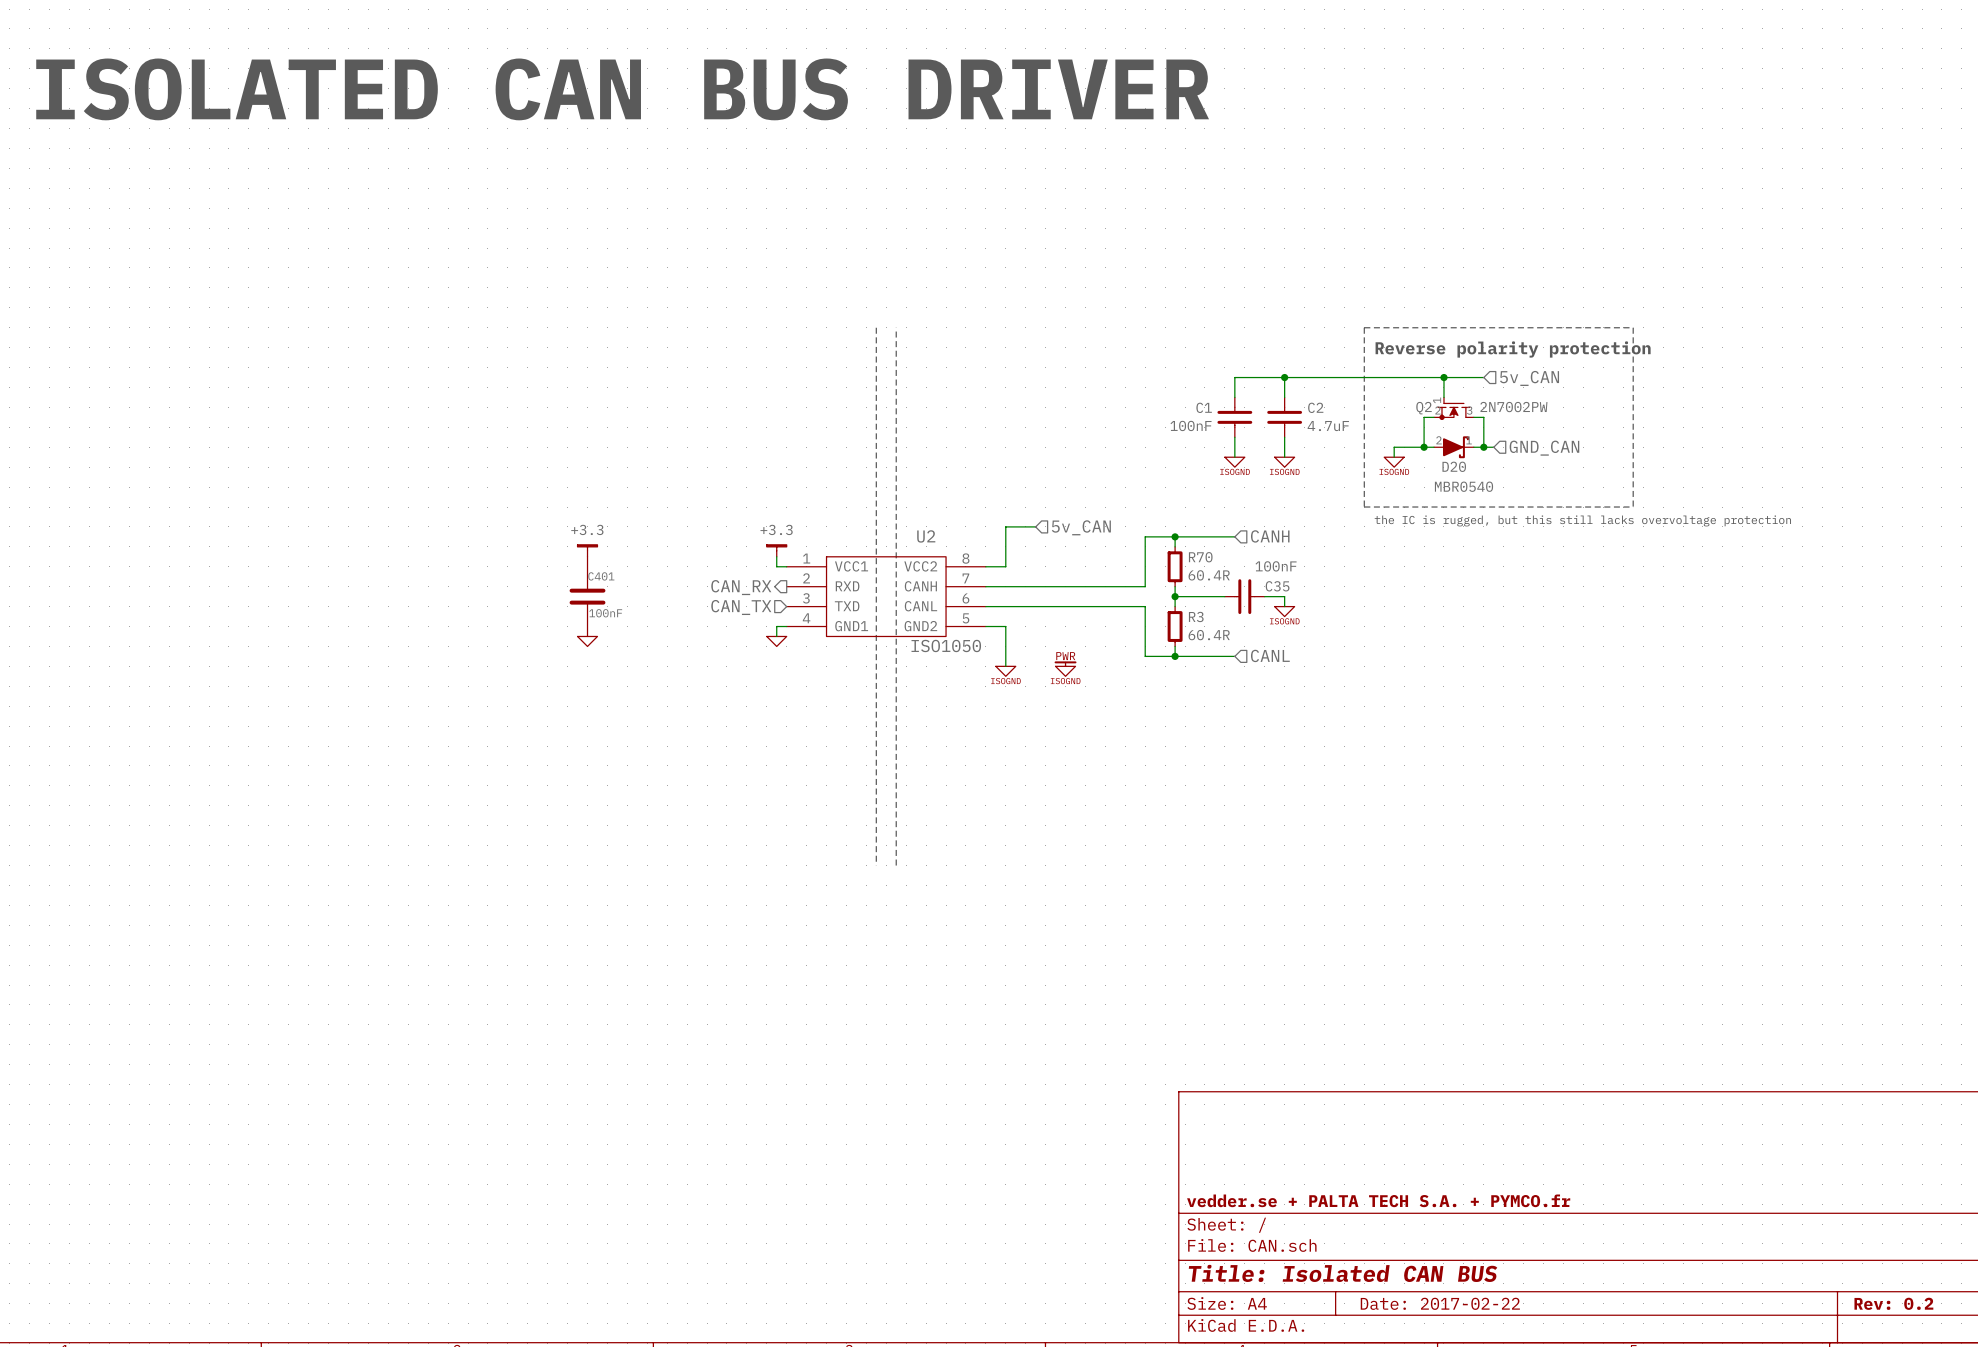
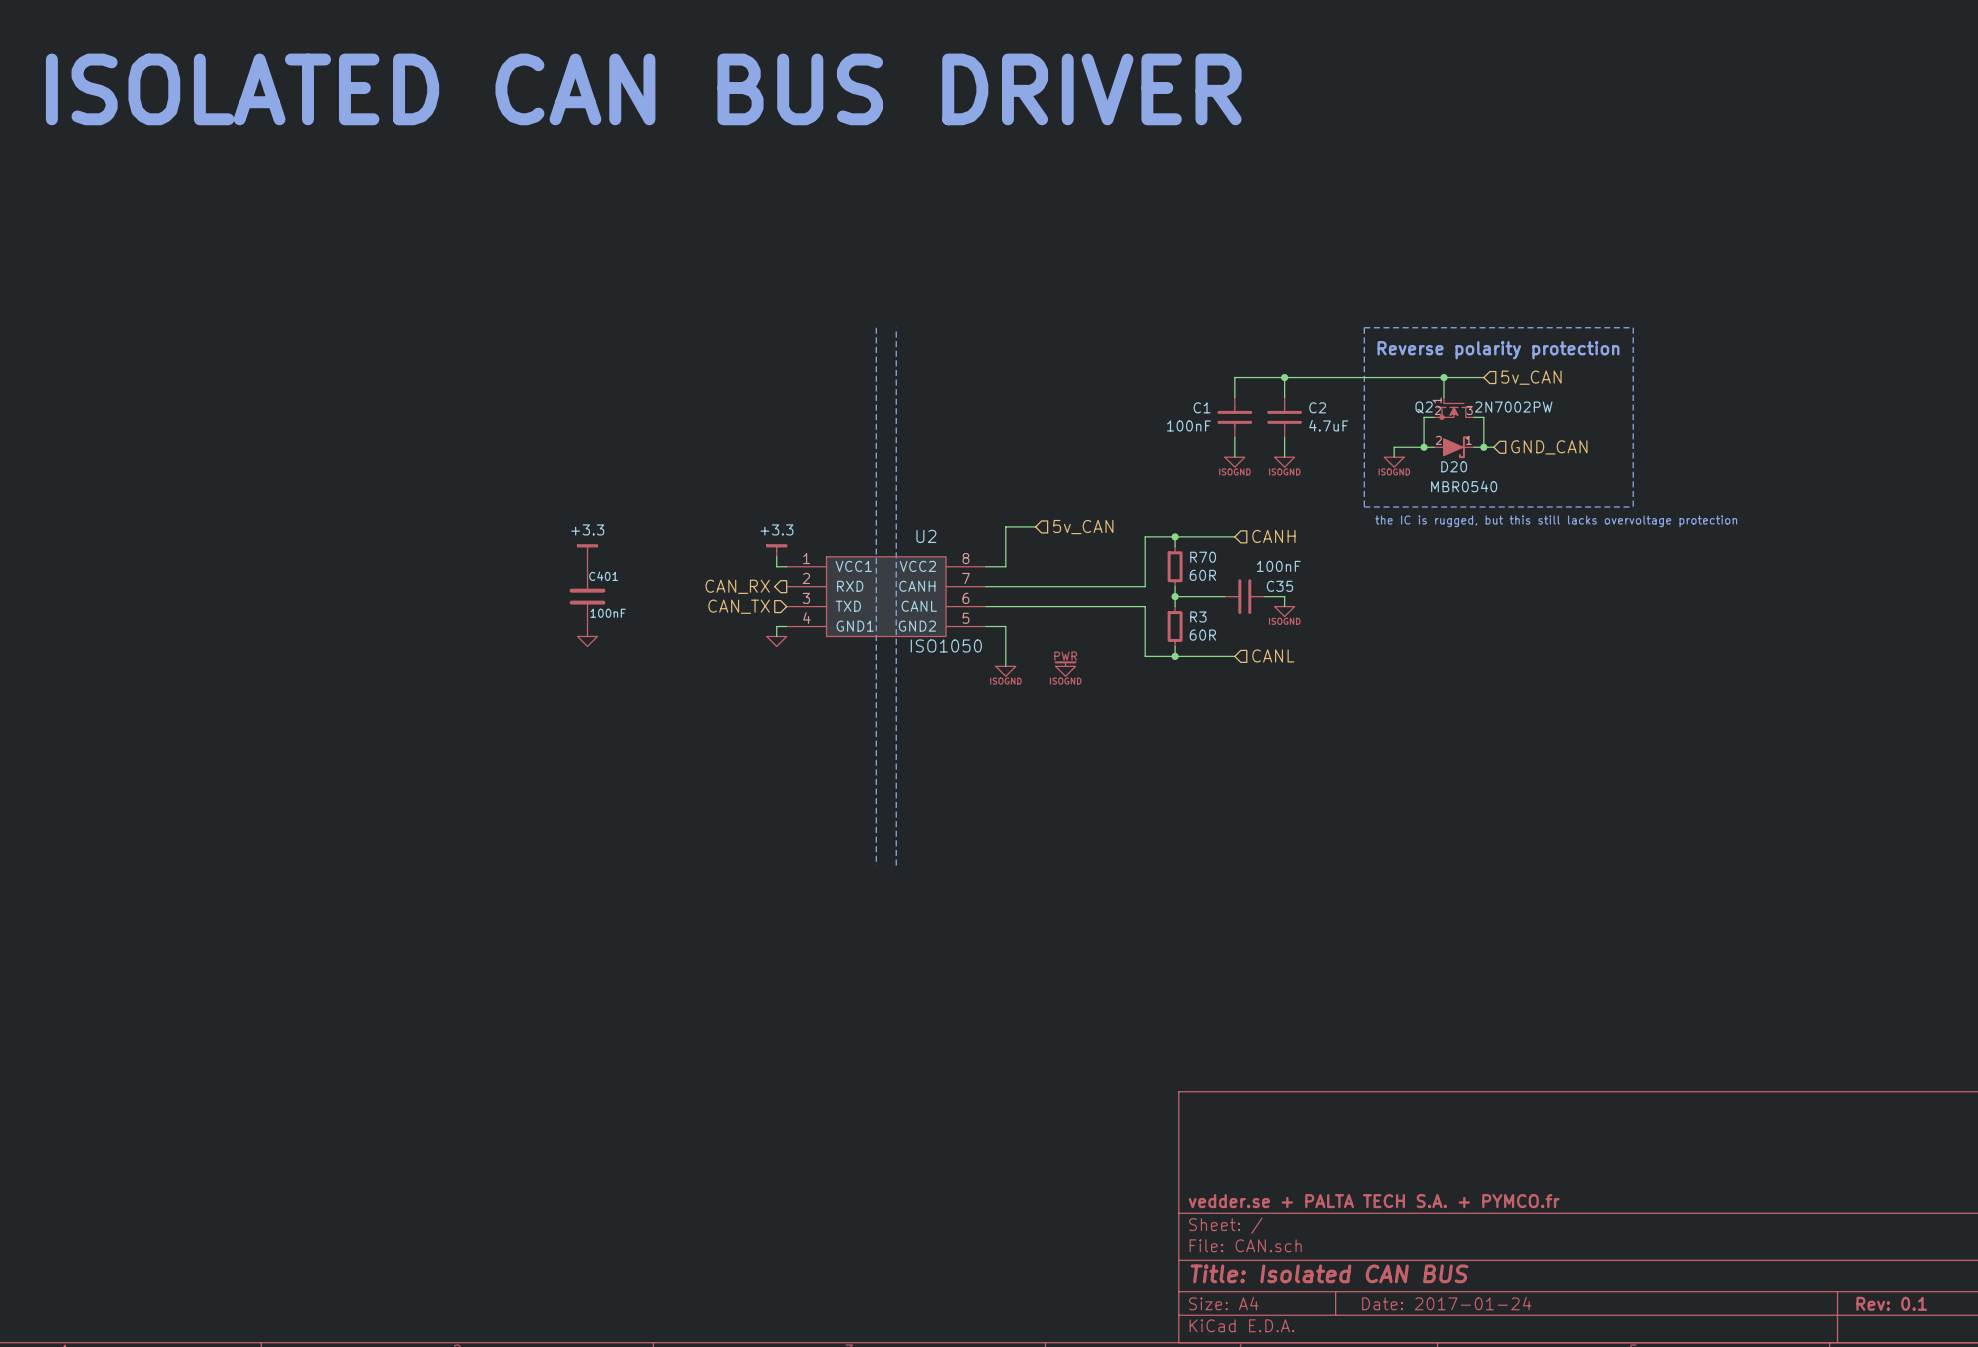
R70 value: 60.4R (1209, 575) -> 60R (1202, 575)
R3 value: 60.4R (1209, 635) -> 60R (1202, 635)
title block: Date: 2017-02-22 (1440, 1303) -> Date: 2017-01-24 (1446, 1303)
title block: Rev: 0.2 (1893, 1303) -> Rev: 0.1 (1891, 1303)

